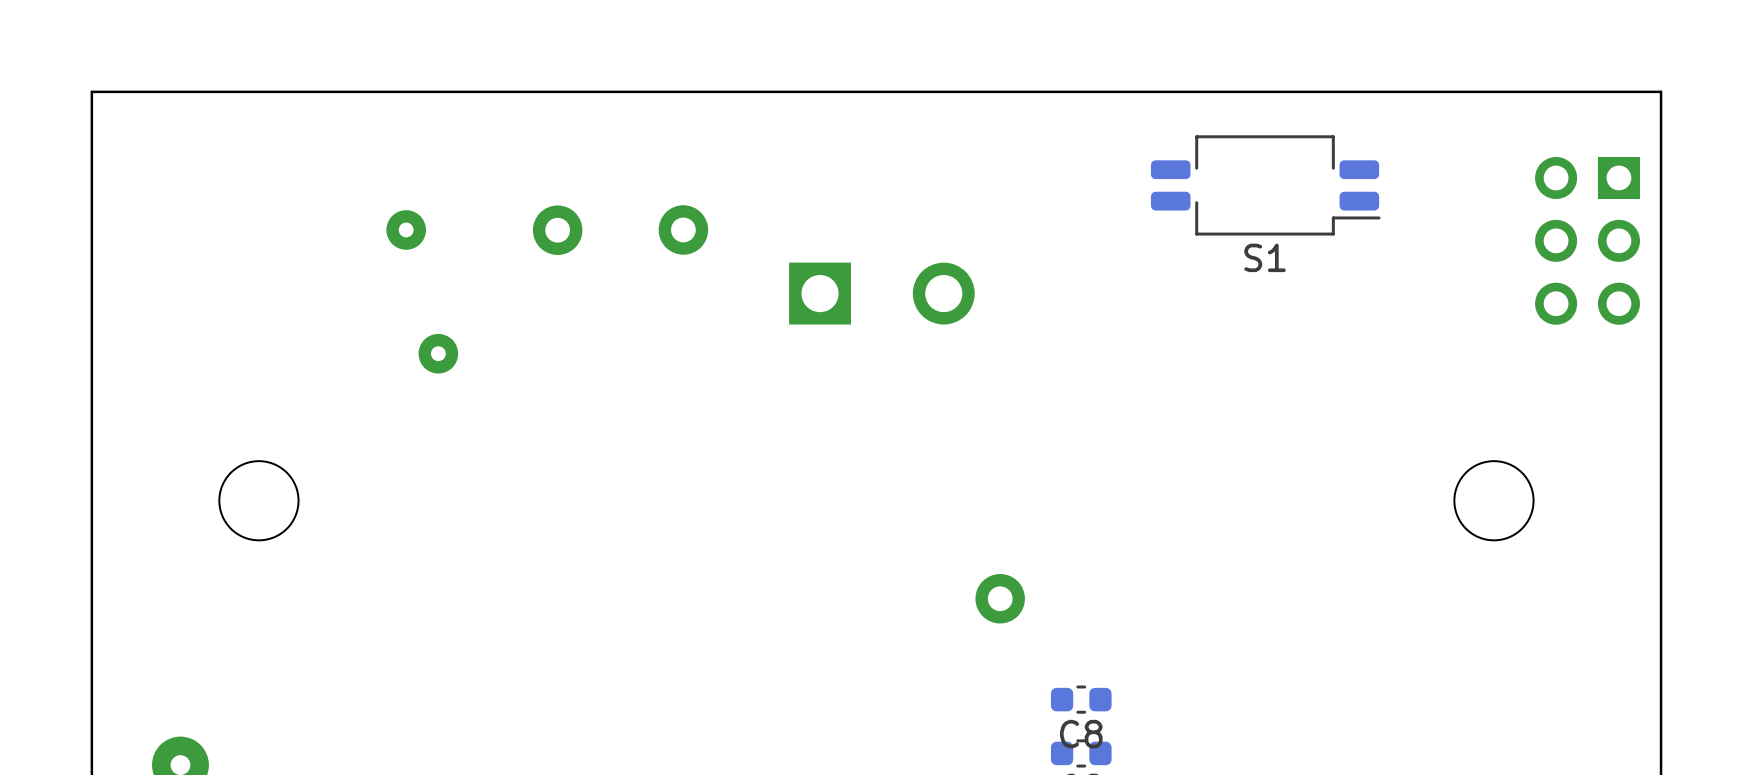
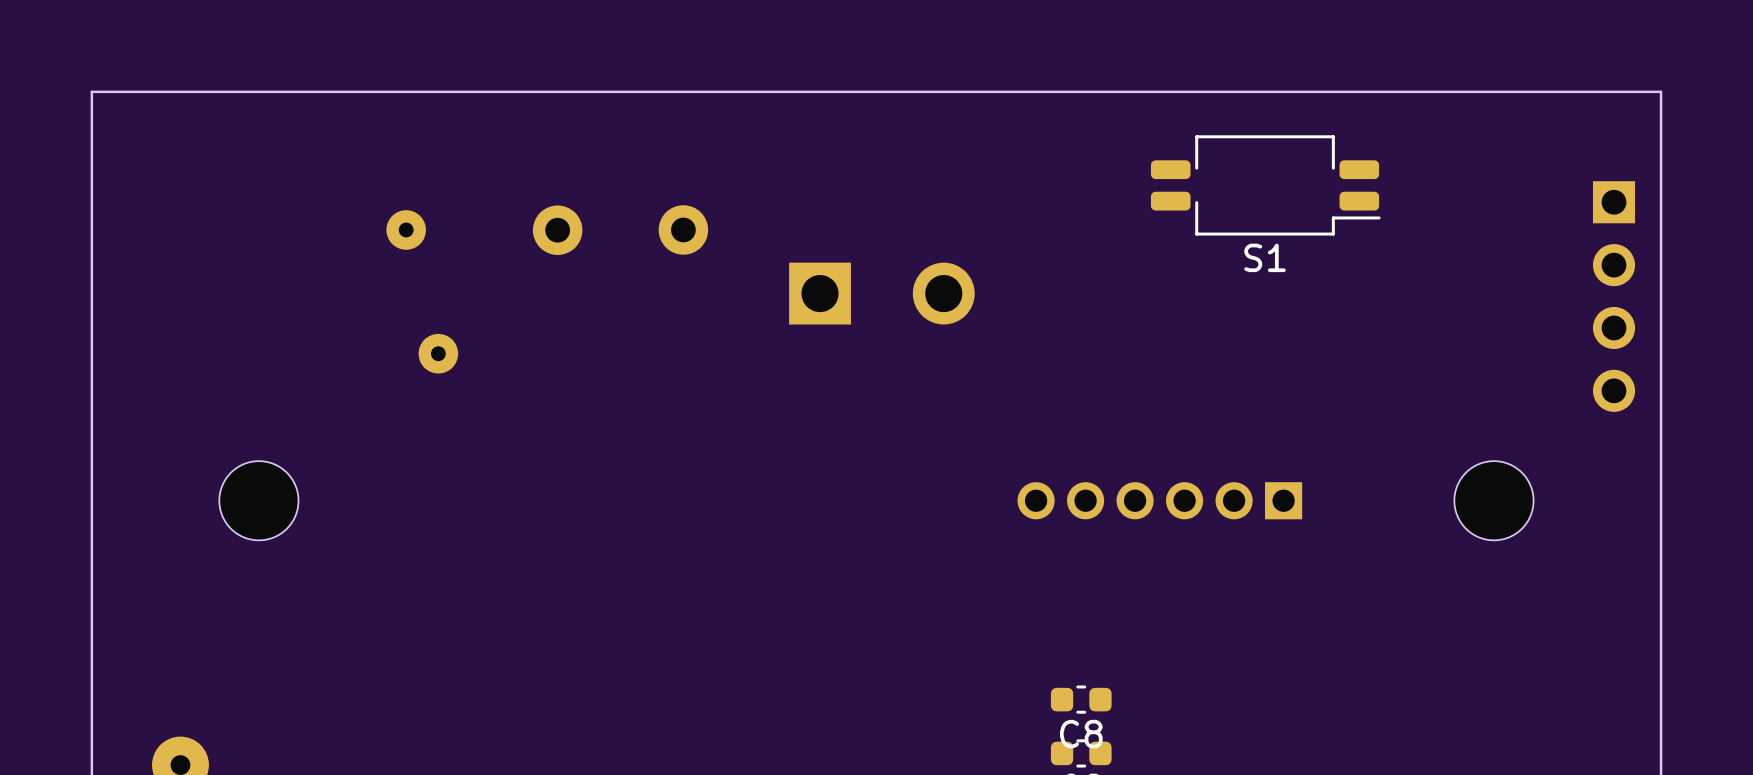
part: (1587, 240) -> none
part: none -> (1614, 296)
part: none -> (1159, 500)
part: (1000, 598) -> none

